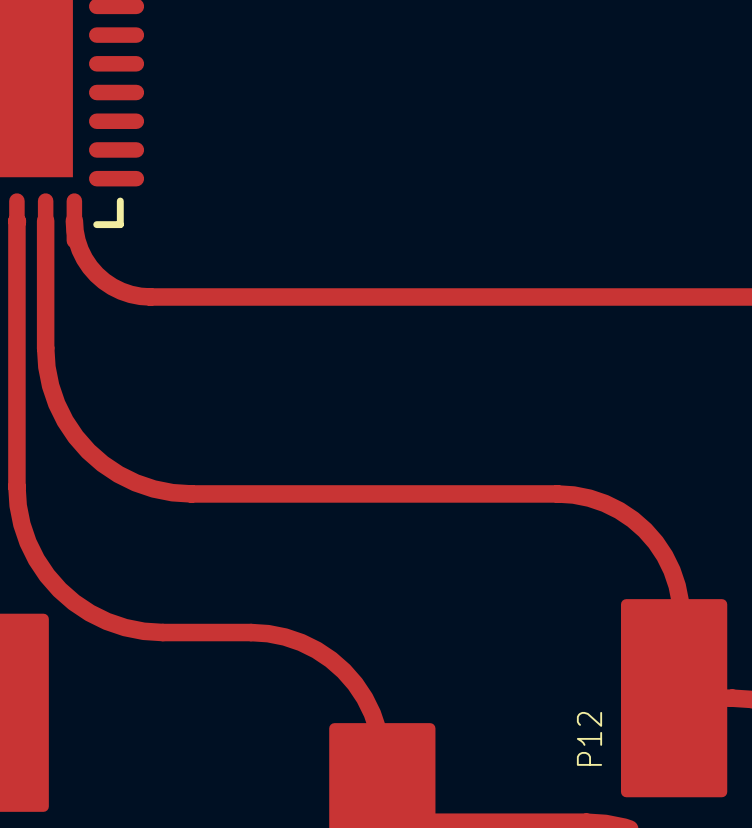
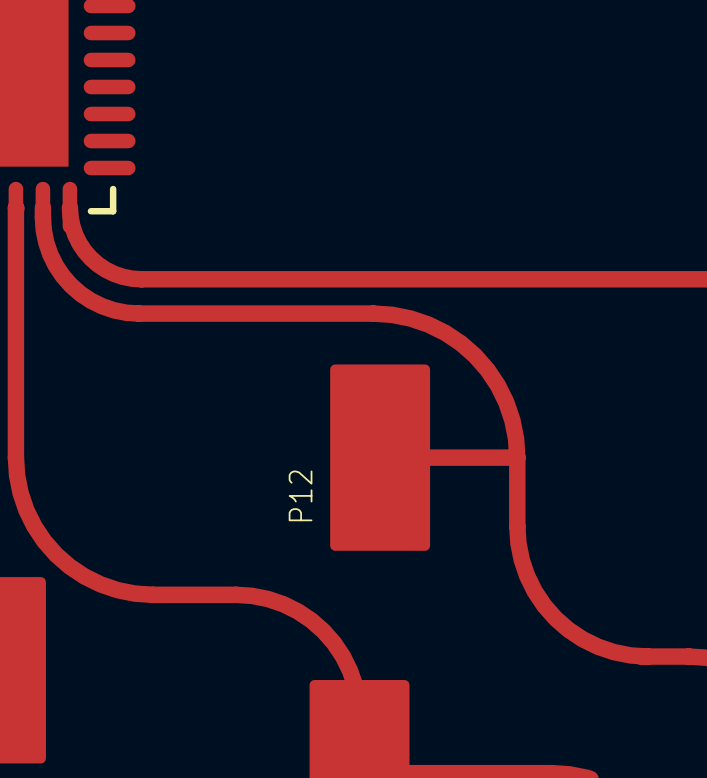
track: (45, 231) (45, 348) (50, 385) (65, 421) (88, 451) (102, 463) (135, 482) (172, 492) (557, 493) (573, 495) (604, 503) (632, 519) (645, 530) (664, 555) (671, 570) (680, 601) (681, 617) (681, 698) (674, 698) -> (42, 217) (46, 242) (55, 265) (62, 276) (80, 293) (90, 300) (114, 310) (138, 313) (392, 314) (410, 318) (445, 332) (475, 355) (498, 385) (512, 420) (517, 457)
track: none -> (380, 457) (517, 457)
track: none -> (517, 457) (518, 543) (521, 559) (534, 591) (555, 618) (582, 639) (613, 652) (647, 656)
P12 position: (674, 698) -> (380, 457)

